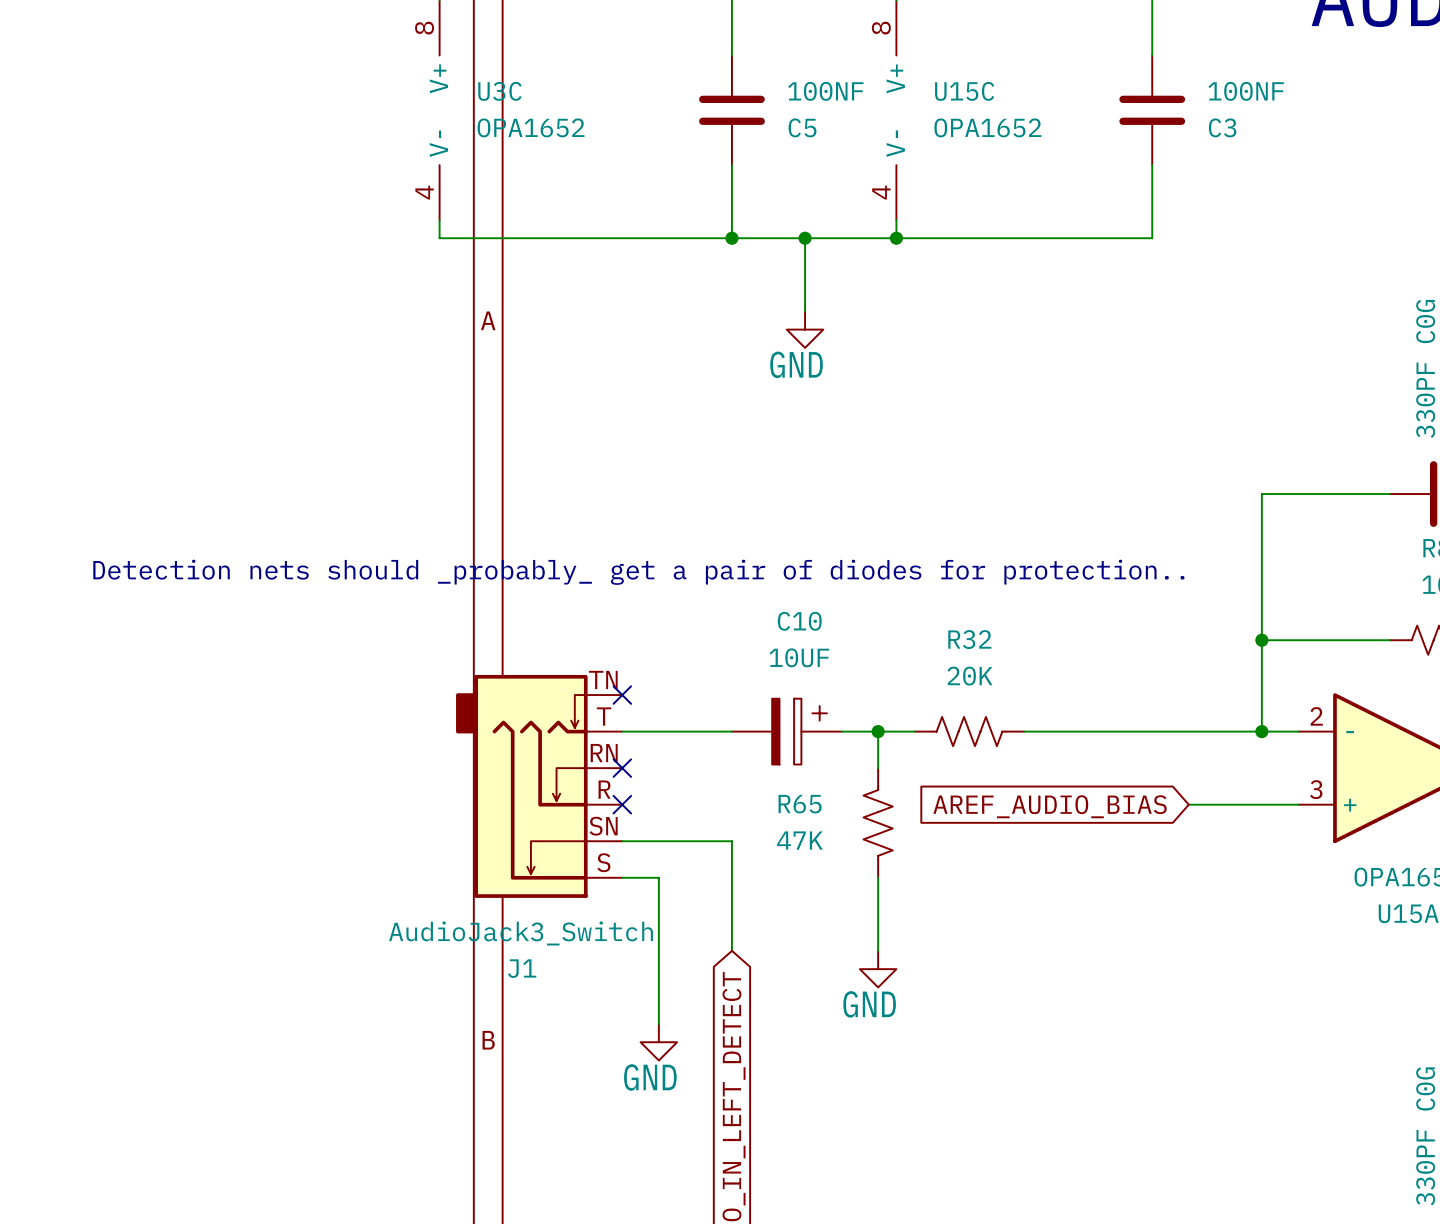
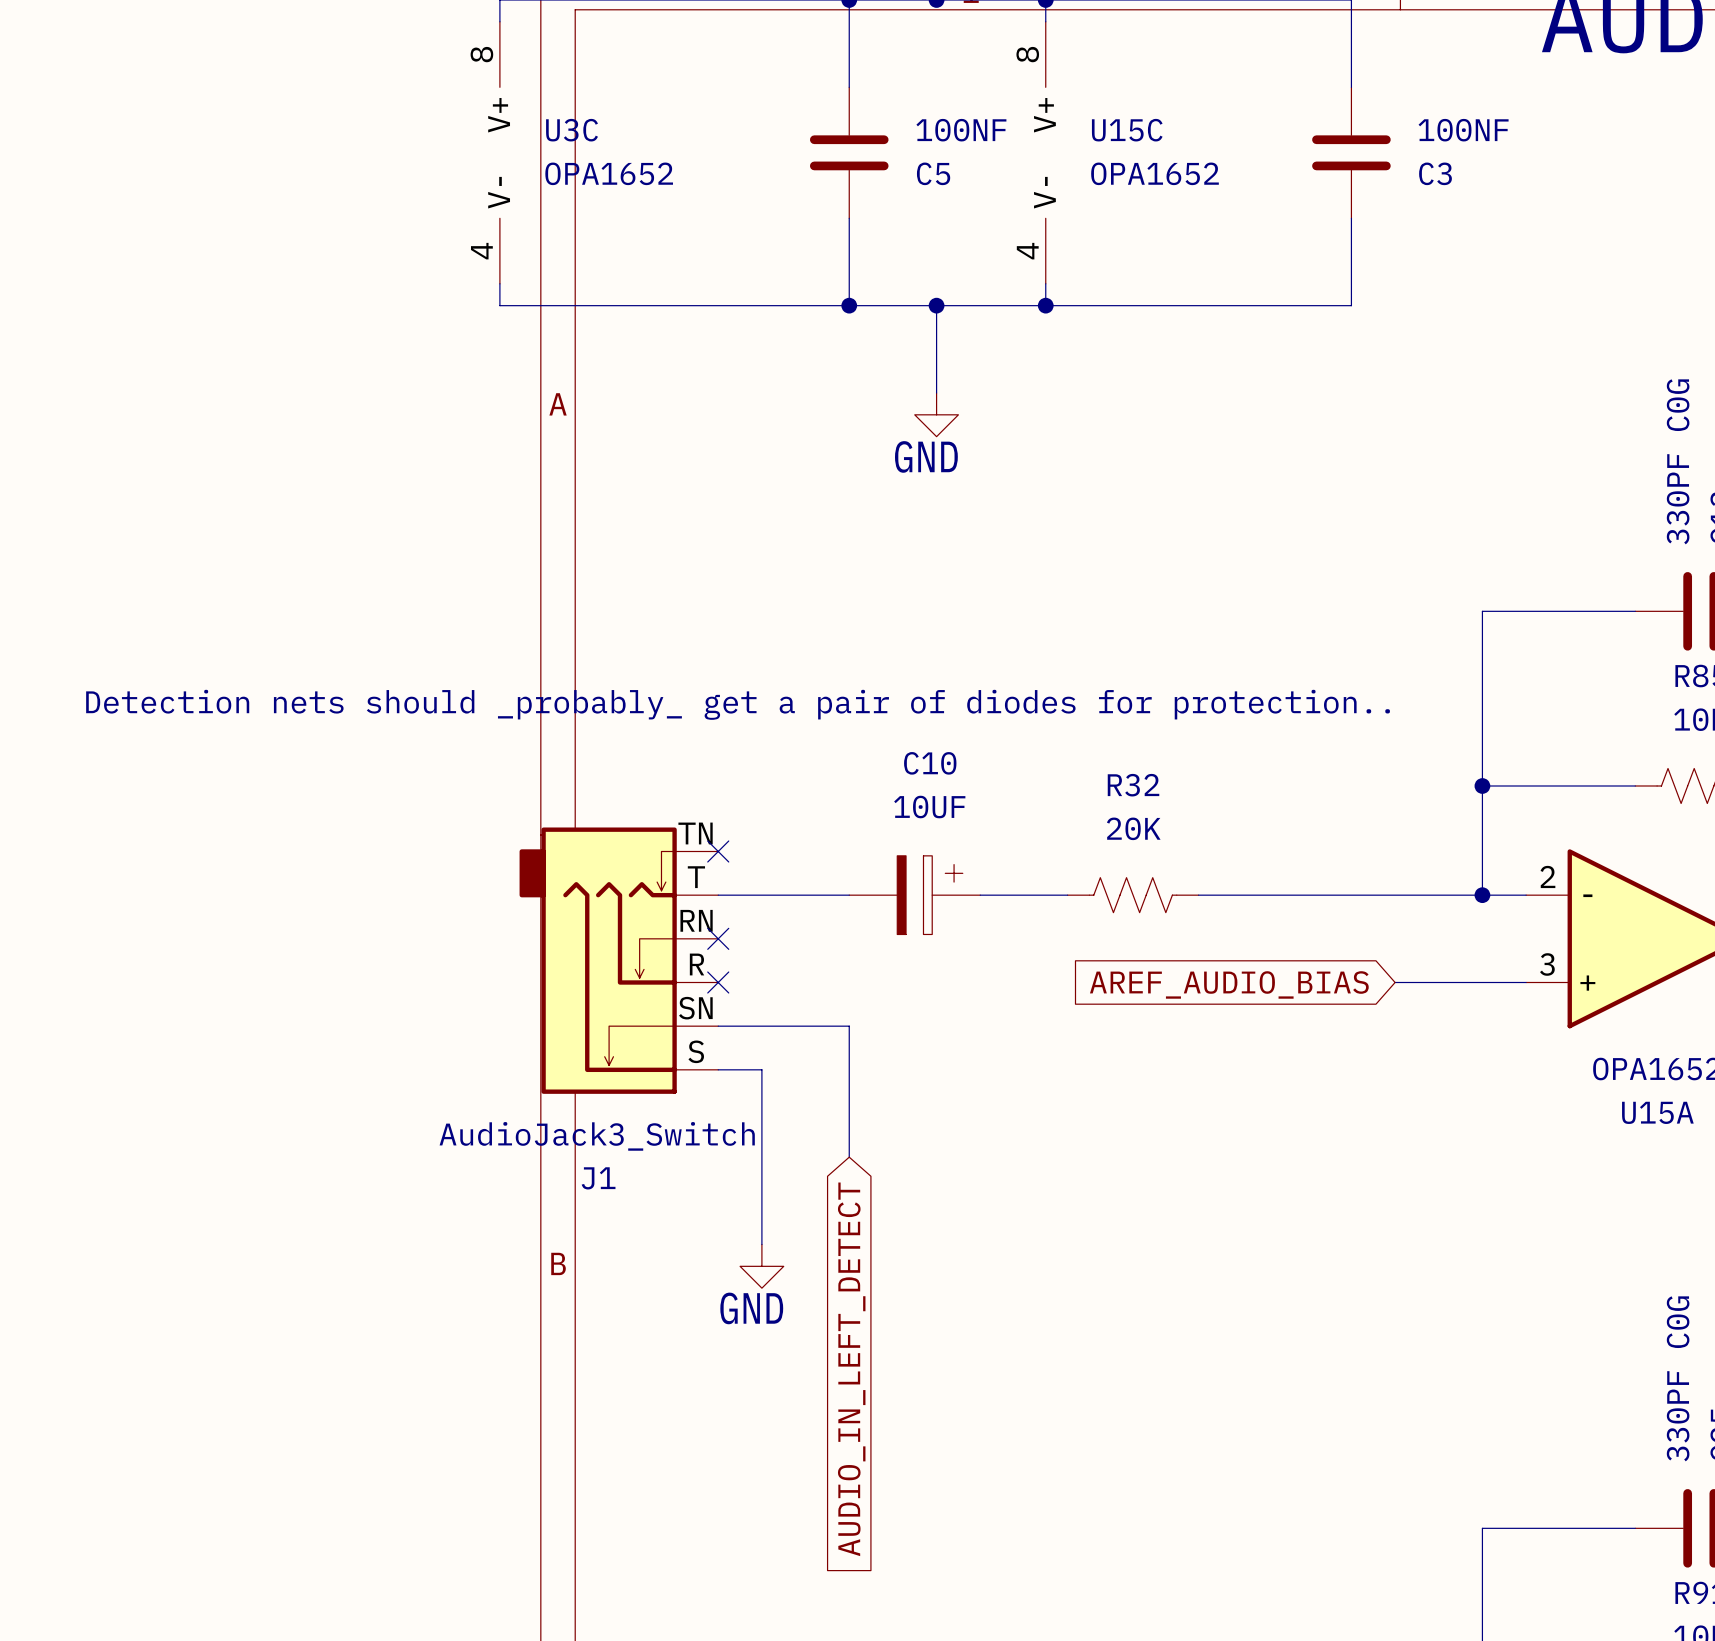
wire: (878, 731) (878, 768) -> none
junction: (878, 731) -> none
R65: 47K (878, 822) -> none
wire: (878, 877) (878, 950) -> none
power symbol: GND (878, 969) -> none

